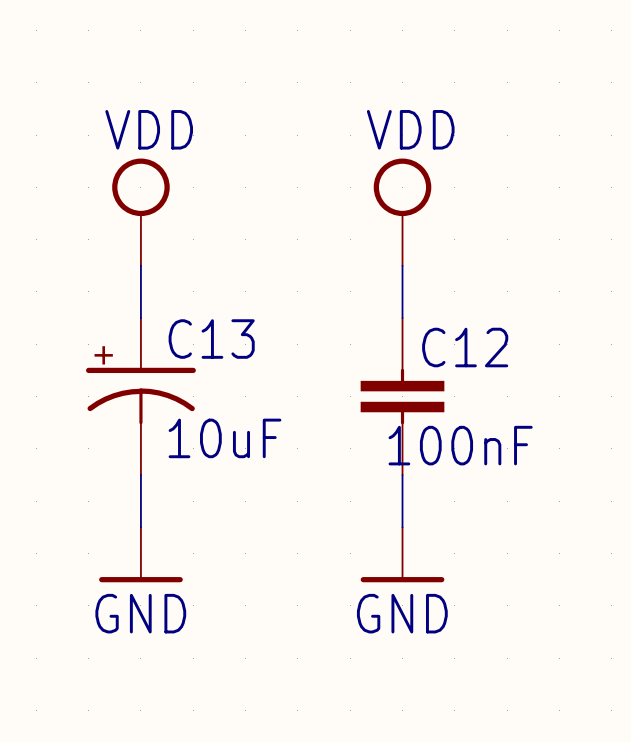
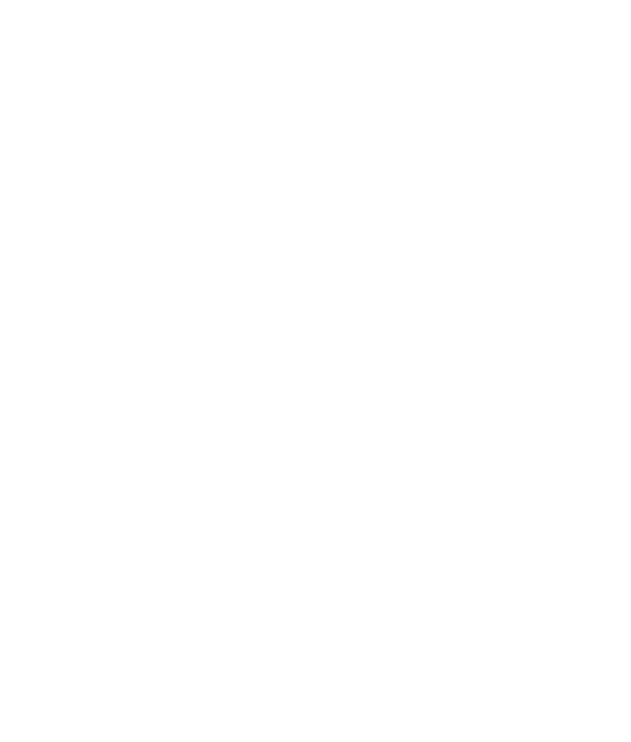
power symbol: VDD (140, 212) -> none
power symbol: VDD (402, 212) -> none
wire: (140, 265) (140, 318) -> none
wire: (402, 265) (402, 318) -> none
C13: 10uF (140, 396) -> none
C12: 100nF (402, 396) -> none
wire: (140, 475) (140, 527) -> none
wire: (402, 475) (402, 527) -> none
power symbol: GND (140, 554) -> none
power symbol: GND (402, 554) -> none

